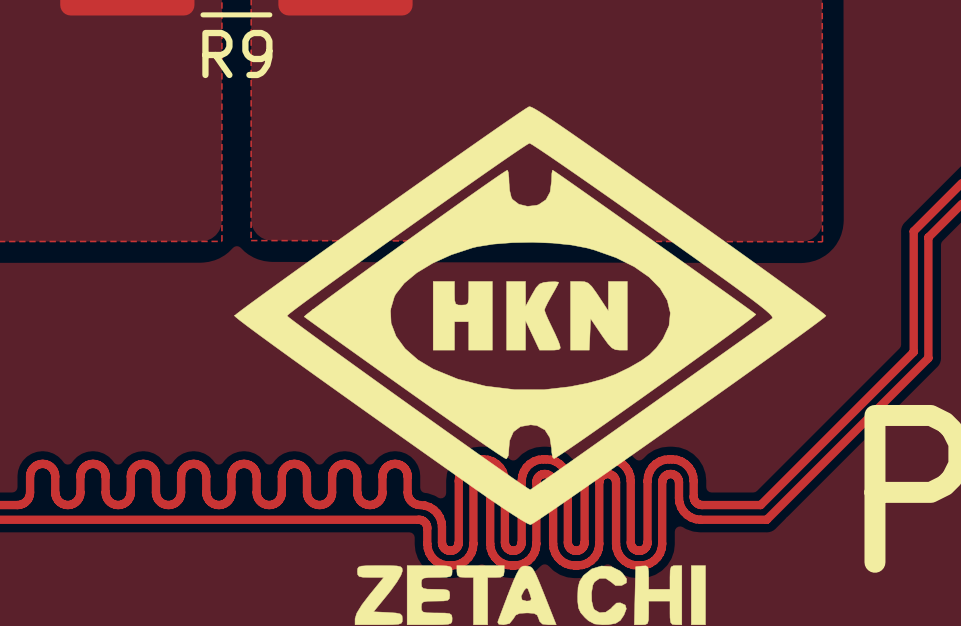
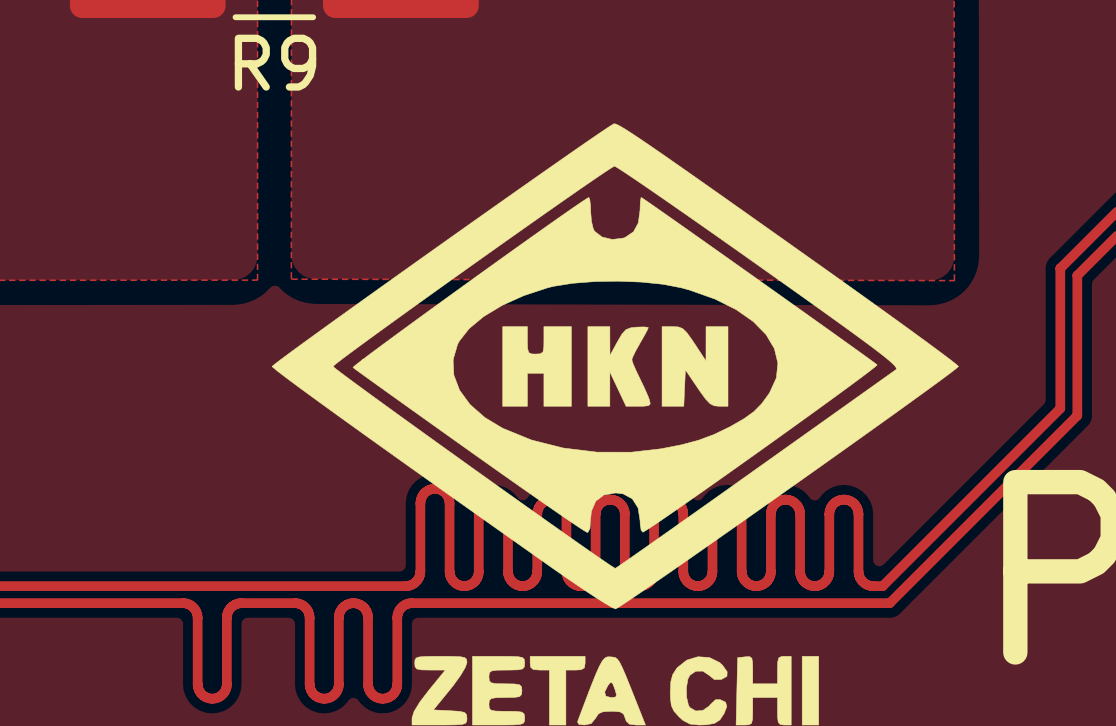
track: (17, 505) (22, 503) (28, 497) (31, 470) (34, 466) (42, 463) (50, 466) (54, 470) (56, 497) (62, 503) (67, 505) (73, 503) (79, 497) (80, 473) (83, 468) (90, 464) (95, 464) (102, 468) (105, 473) (106, 497) (112, 503) (118, 505) (123, 503) (129, 497) (131, 473) (133, 468) (140, 464) (146, 464) (153, 468) (155, 473) (157, 497) (163, 503) (168, 505) (173, 503) (179, 497) (181, 473) (183, 468) (190, 464) (196, 464) (203, 468) (205, 473) (207, 497) (213, 503) (218, 505) (224, 503) (230, 497) (231, 473) (234, 468) (241, 464) (246, 464) (253, 468) (256, 473) (257, 497) (263, 503) (269, 505) (274, 503) (280, 497) (282, 473) (288, 465) (297, 464) (304, 468) (306, 473) (308, 497) (314, 503) (319, 505) (325, 503) (330, 497) (332, 473) (334, 468) (341, 464) (347, 464) (352, 466) (356, 473) (358, 497) (364, 503) (369, 505) (375, 503) (381, 497) (383, 470) (387, 466) (395, 463) (402, 466) (406, 470) (407, 495) (410, 500) (414, 503) (429, 507) (437, 513) (441, 521) (442, 544) (445, 549) (450, 550) (455, 549) (458, 544) (459, 476) (463, 467) (475, 459) (492, 461) (502, 471) (504, 481) (504, 542) (506, 547) (511, 550) (516, 550) (521, 544) (522, 476) (526, 467) (538, 459) (555, 461) (565, 471) (567, 481) (567, 542) (569, 547) (574, 550) (579, 550) (584, 544) (585, 476) (589, 467) (601, 459) (618, 461) (628, 471) (630, 481) (630, 542) (632, 547) (637, 550) (642, 550) (647, 544) (648, 476) (652, 467) (659, 461) (676, 459) (688, 467) (693, 476) (693, 498) (698, 504) (752, 505) -> (20, 586) (409, 585) (417, 580) (420, 574) (420, 500) (425, 491) (434, 488) (444, 491) (449, 500) (449, 574) (452, 580) (460, 585) (470, 584) (477, 577) (479, 510) (484, 502) (493, 499) (502, 502) (507, 510) (508, 574) (511, 580) (519, 585) (528, 584) (535, 577) (537, 510) (542, 502) (551, 499) (560, 502) (566, 510) (566, 574) (569, 580) (577, 585) (587, 584) (594, 577) (595, 510) (601, 502) (610, 499) (619, 502) (624, 510) (625, 574) (633, 584) (642, 585) (652, 577) (654, 510) (659, 502) (668, 499) (677, 502) (682, 510) (683, 571) (688, 582) (701, 585) (711, 577) (712, 510) (717, 502) (727, 499) (736, 502) (741, 510) (743, 577) (753, 585) (762, 584) (770, 574) (771, 510) (776, 502) (785, 499) (794, 502) (799, 510) (801, 577) (808, 584) (817, 585) (826, 580) (828, 574) (829, 510) (834, 502) (843, 499) (853, 502) (858, 510) (858, 574) (864, 582) (873, 586)
track: (157, 519) (208, 519) -> (183, 603) (192, 606) (197, 614) (198, 687) (203, 695) (212, 698) (221, 695) (226, 687) (227, 614) (232, 606) (241, 603)
track: (254, 519) (354, 519) -> (295, 603) (304, 606) (309, 614) (309, 687) (315, 695) (324, 698) (333, 695) (338, 687) (339, 614) (344, 606) (353, 603) (362, 606) (367, 614) (369, 690) (379, 698) (385, 698) (394, 693) (397, 684) (397, 614) (402, 606) (411, 603)
track: (418, 519) (424, 521) (427, 526) (427, 548) (432, 557) (439, 563) (449, 565) (456, 564) (465, 560) (472, 548) (473, 482) (475, 477) (479, 474) (485, 474) (490, 480) (490, 548) (498, 560) (507, 564) (524, 563) (534, 553) (536, 543) (536, 482) (538, 477) (542, 474) (548, 474) (552, 480) (553, 548) (561, 560) (570, 564) (586, 563) (597, 553) (599, 543) (599, 482) (601, 477) (605, 474) (611, 474) (615, 480) (616, 548) (620, 557) (628, 563) (645, 564) (654, 560) (660, 553) (662, 543) (662, 482) (666, 474) (674, 474) (678, 478) (679, 502) (683, 511) (691, 517) (700, 519) -> (486, 603) (813, 603)

